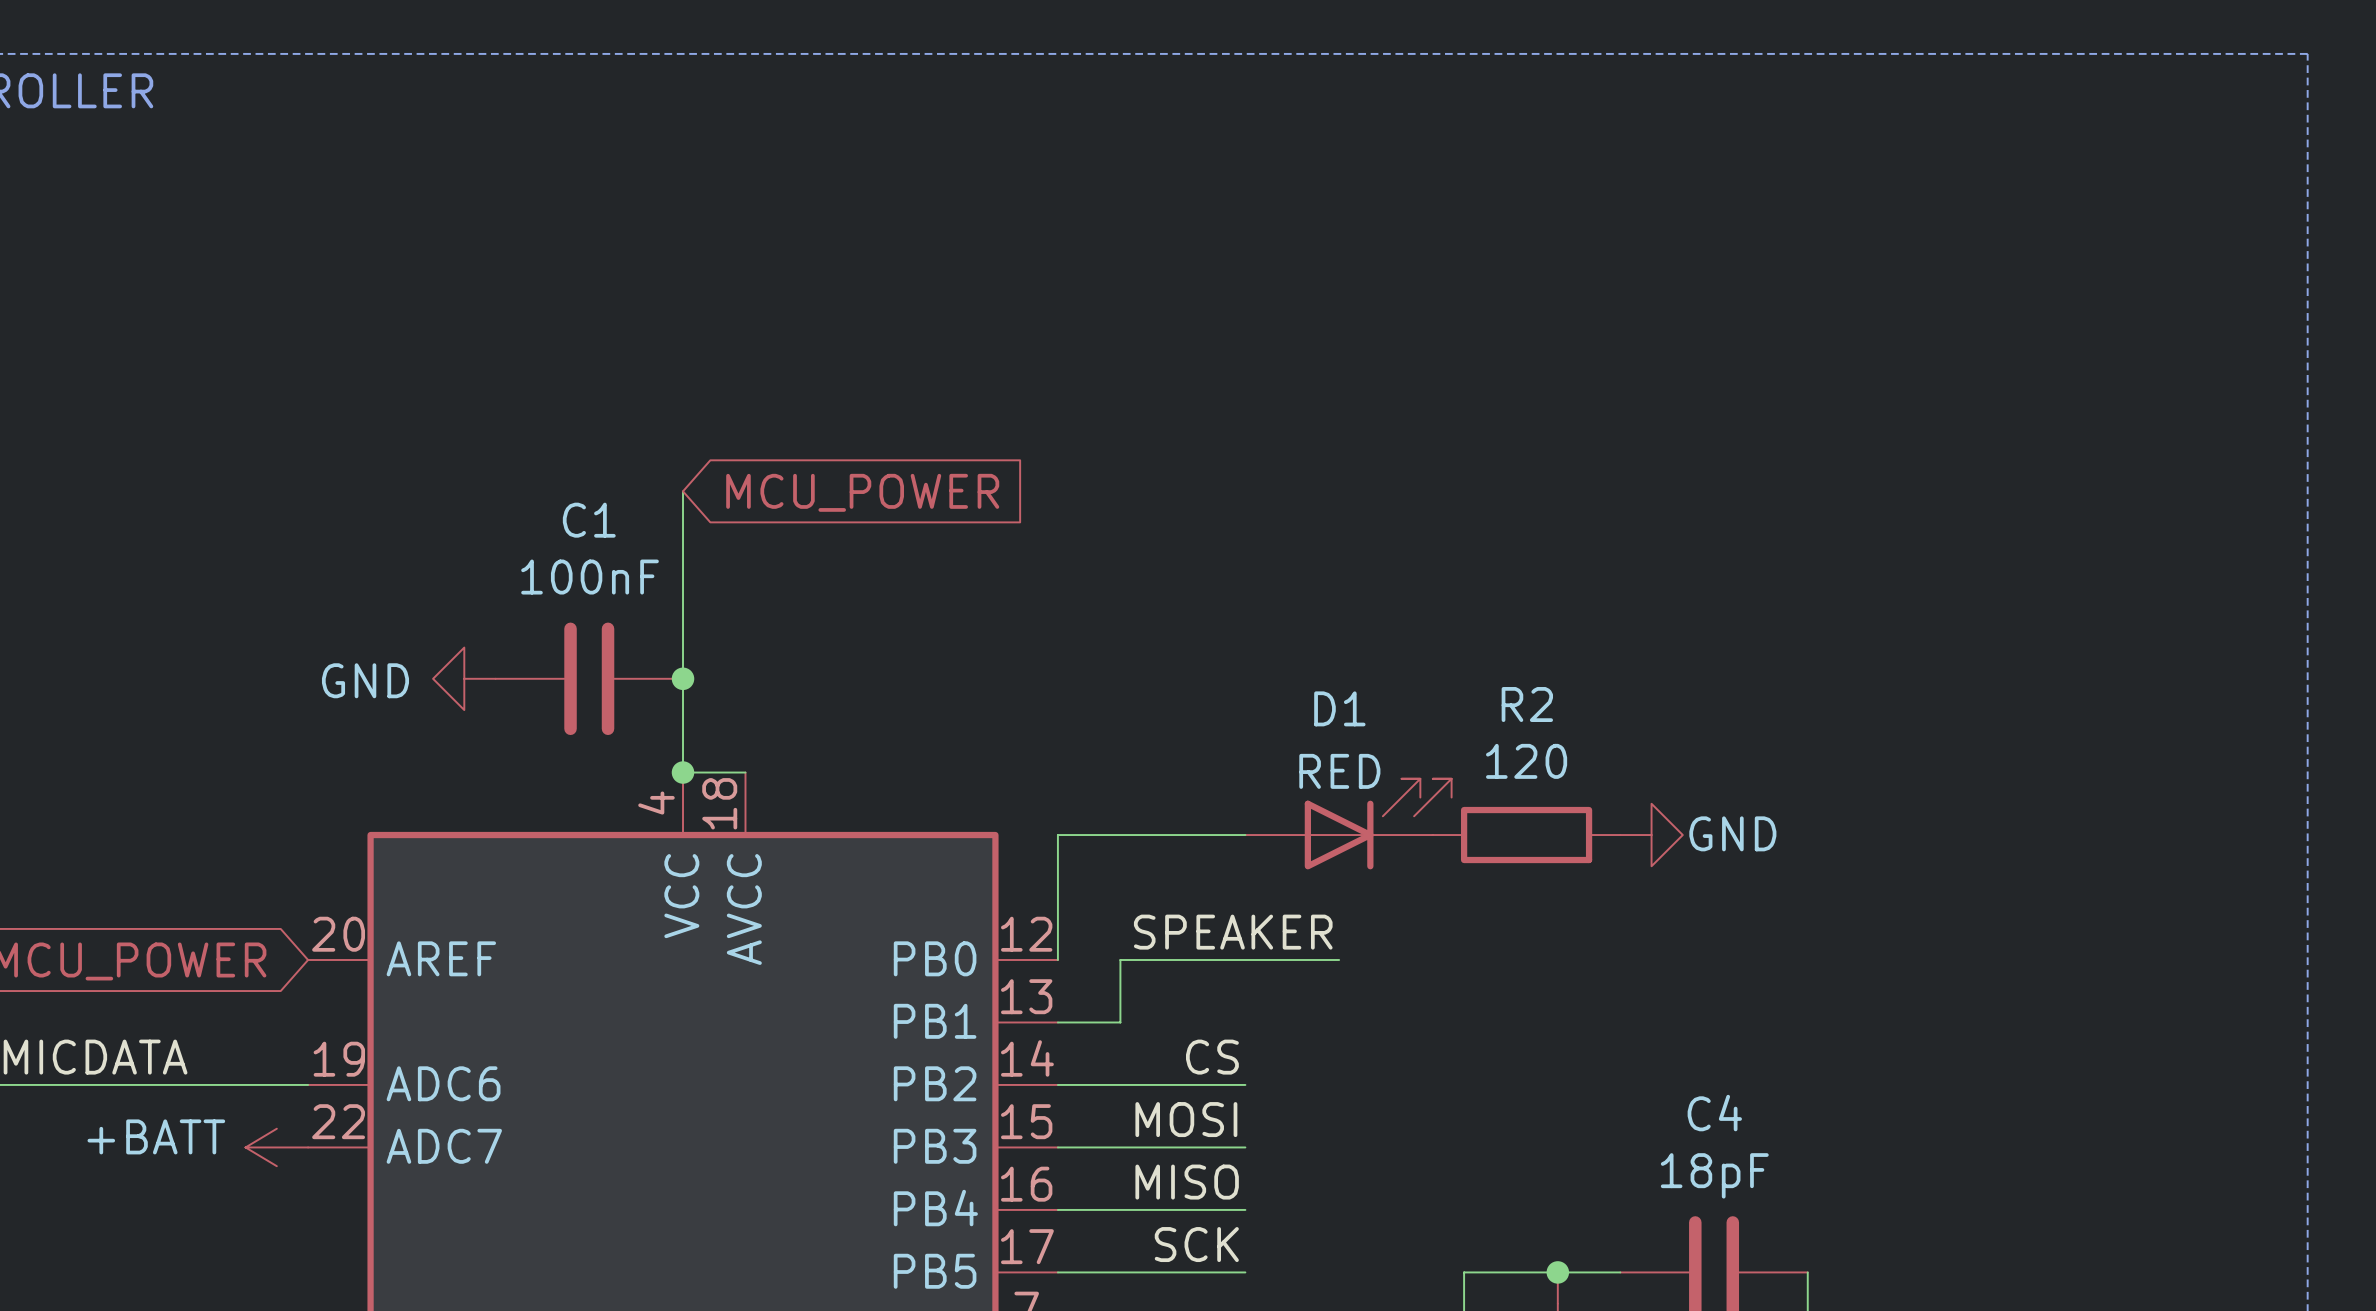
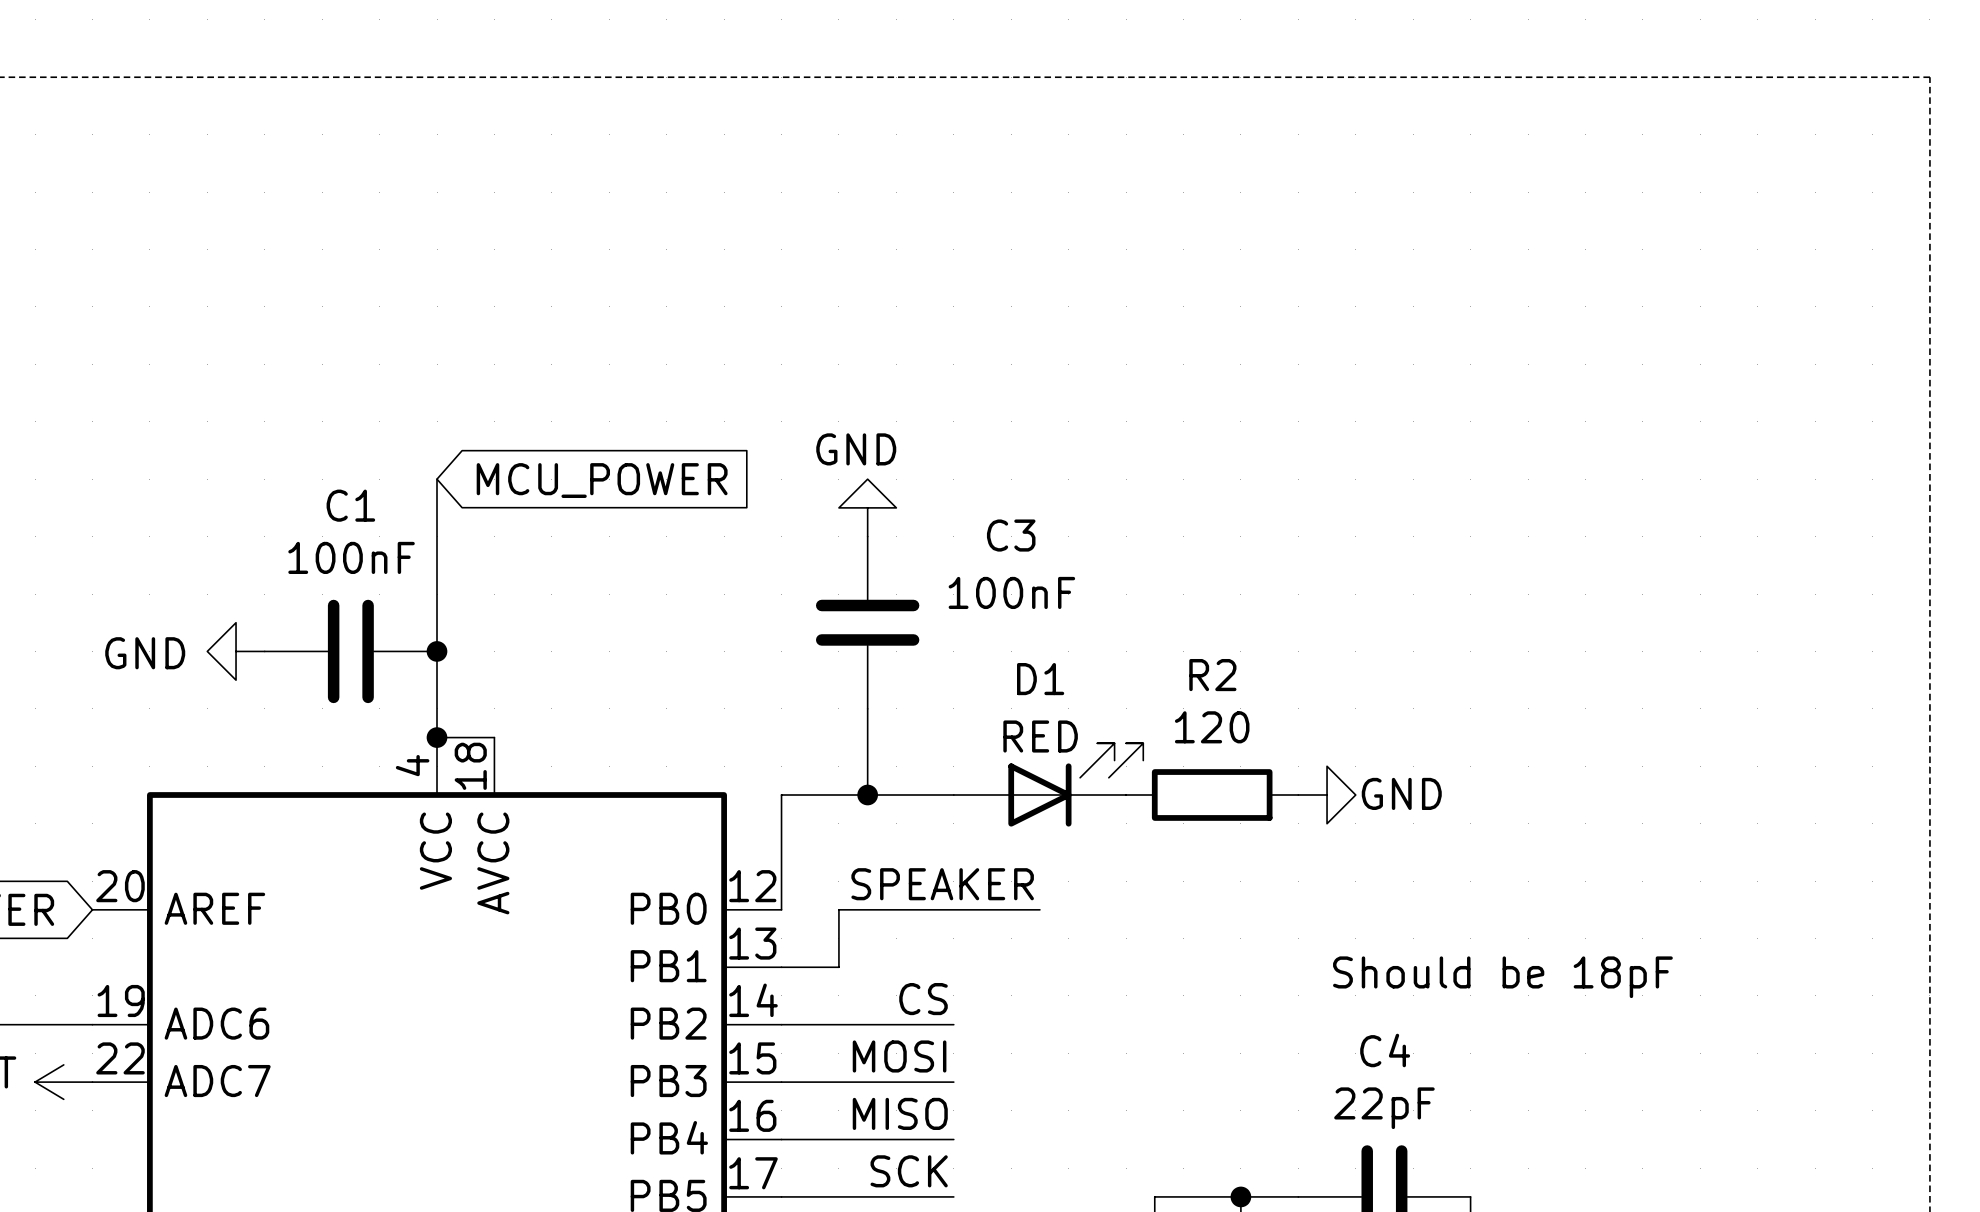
power symbol: none -> GND (867, 507)
C3: none -> 100nF (867, 622)
wire: none -> (867, 708) (867, 795)
junction: none -> (867, 795)
text: none -> Should be 18pF (1502, 977)
C4 value: 18pF (1714, 1175) -> 22pF (1384, 1108)

